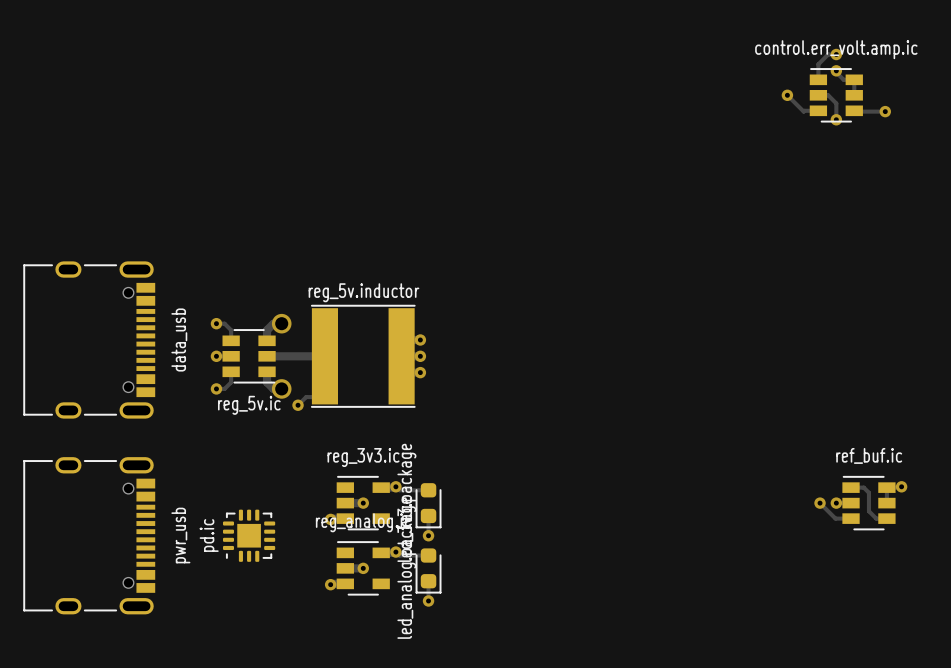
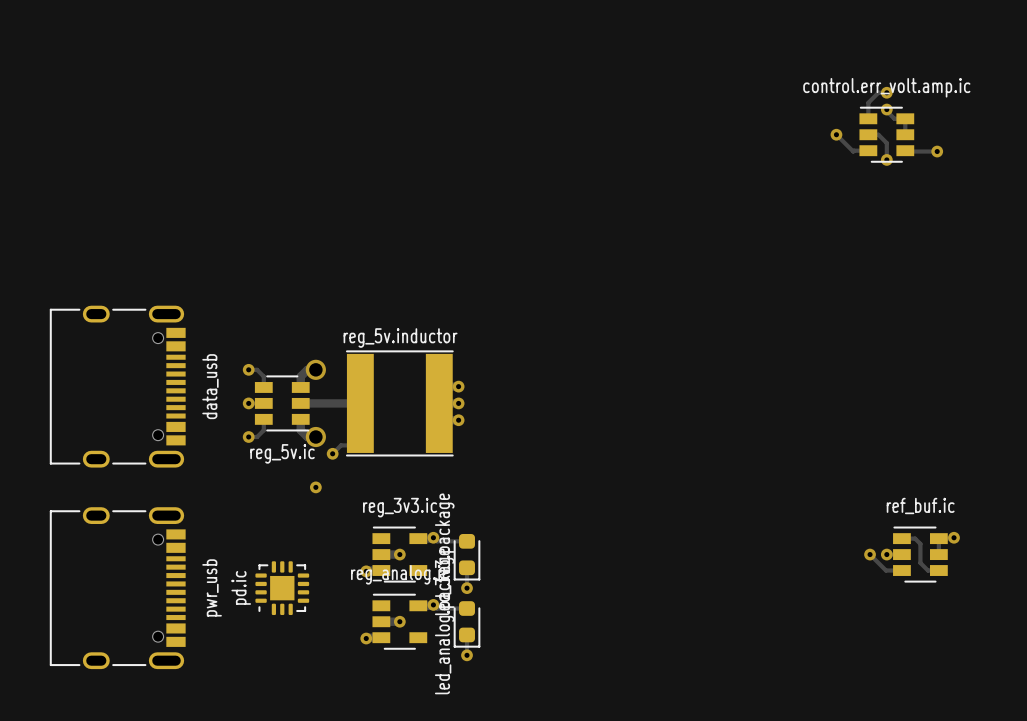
via: none -> (315, 487)

